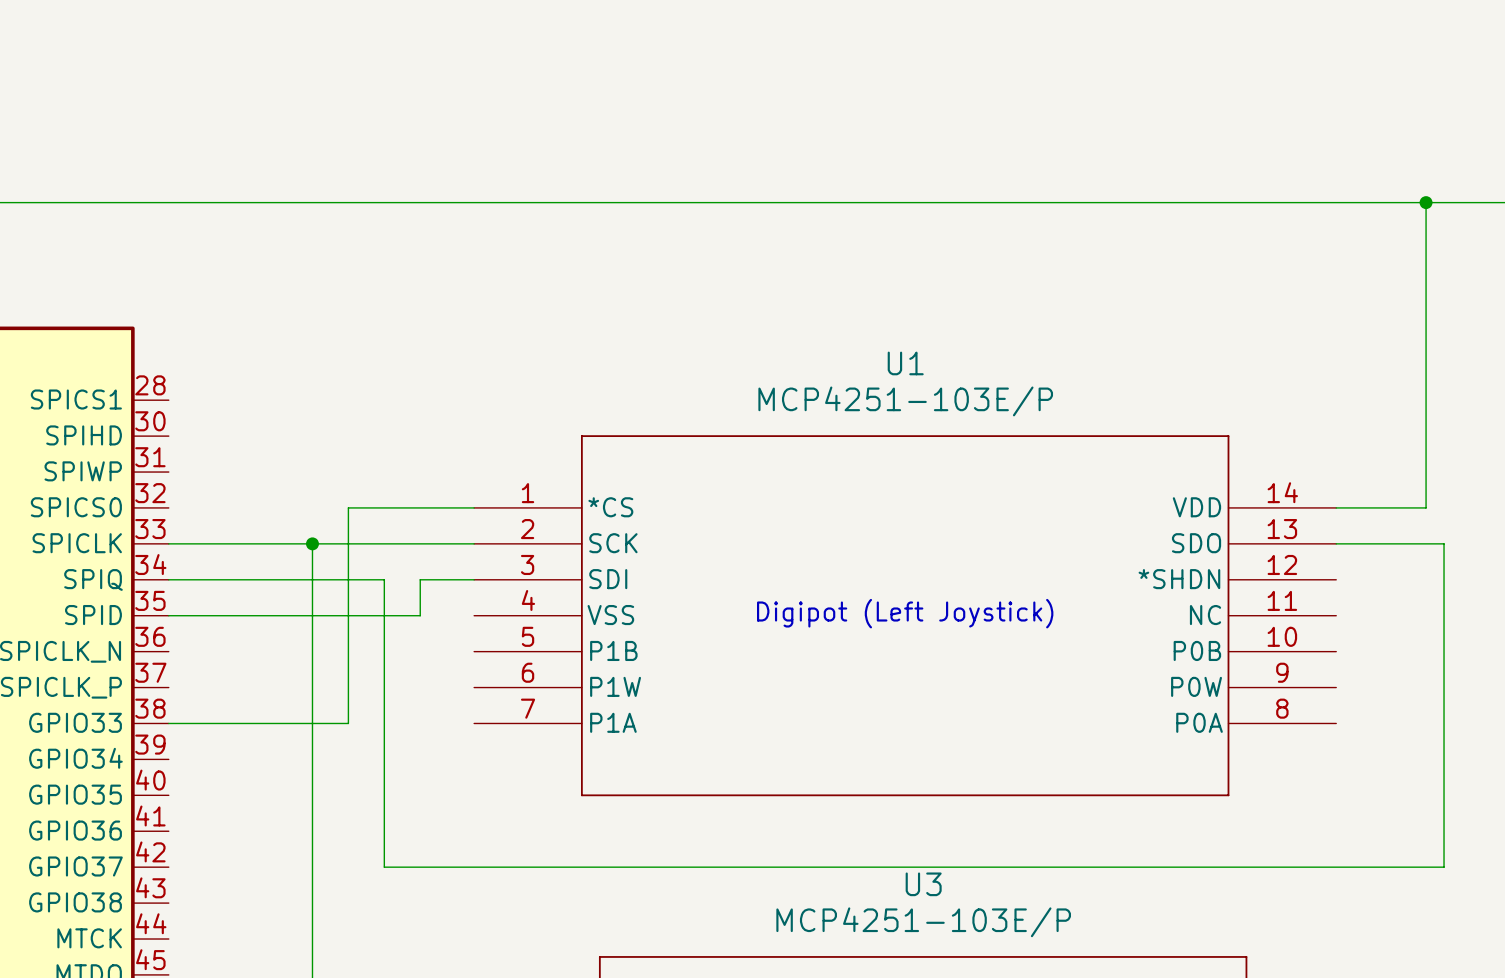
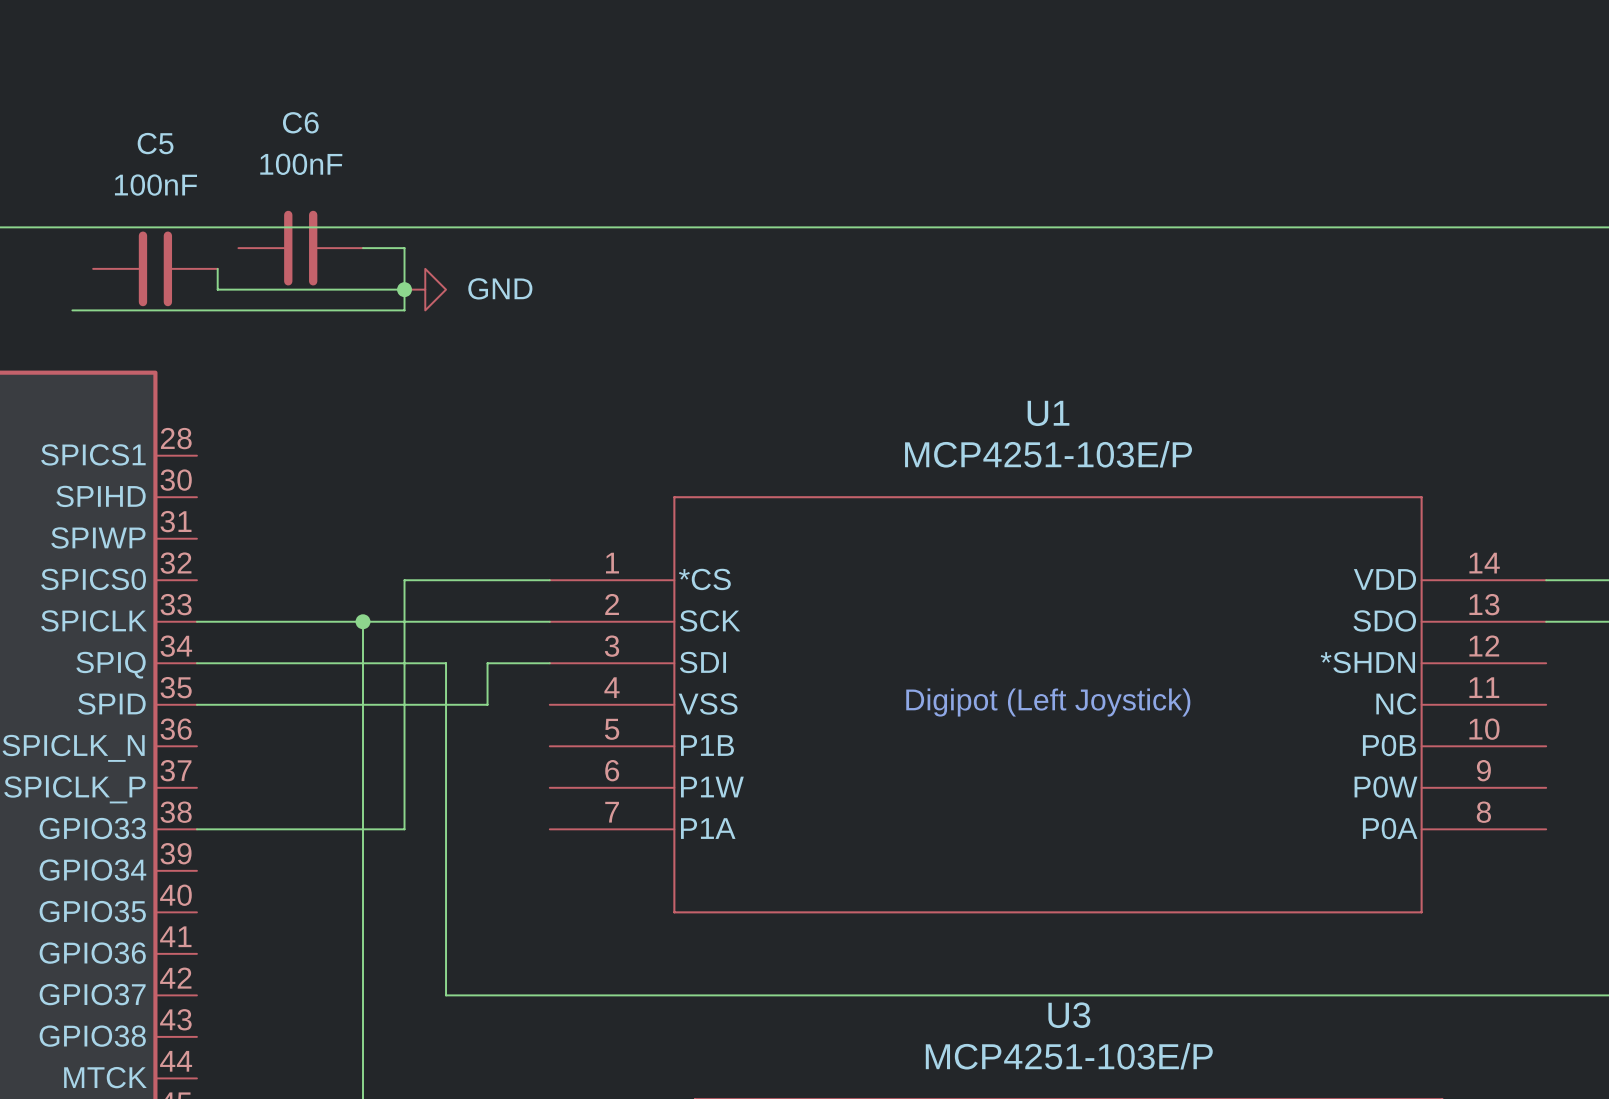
C6: none -> 100nF (300, 248)
wire: none -> (363, 248) (404, 248) (404, 310) (72, 310)
C5: none -> 100nF (155, 268)
wire: none -> (217, 268) (217, 289) (404, 289)
junction: none -> (404, 289)
power symbol: none -> GND (425, 289)

